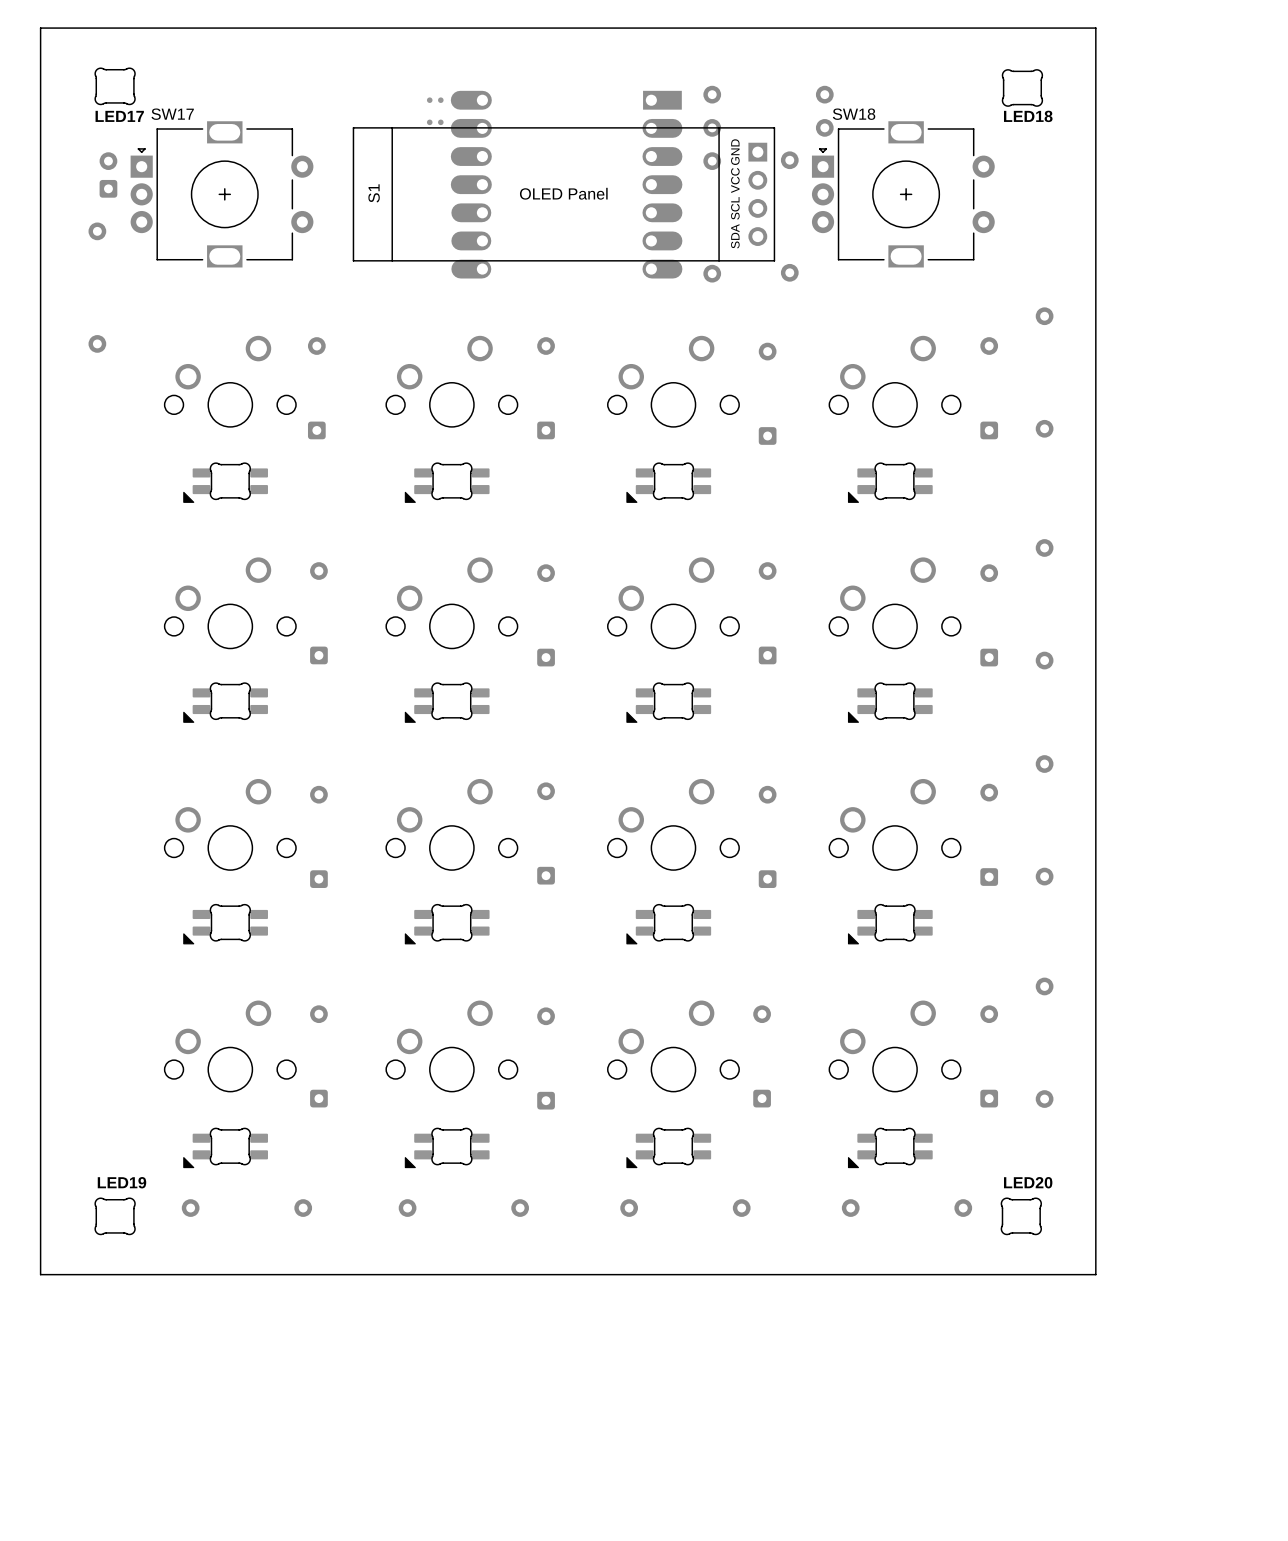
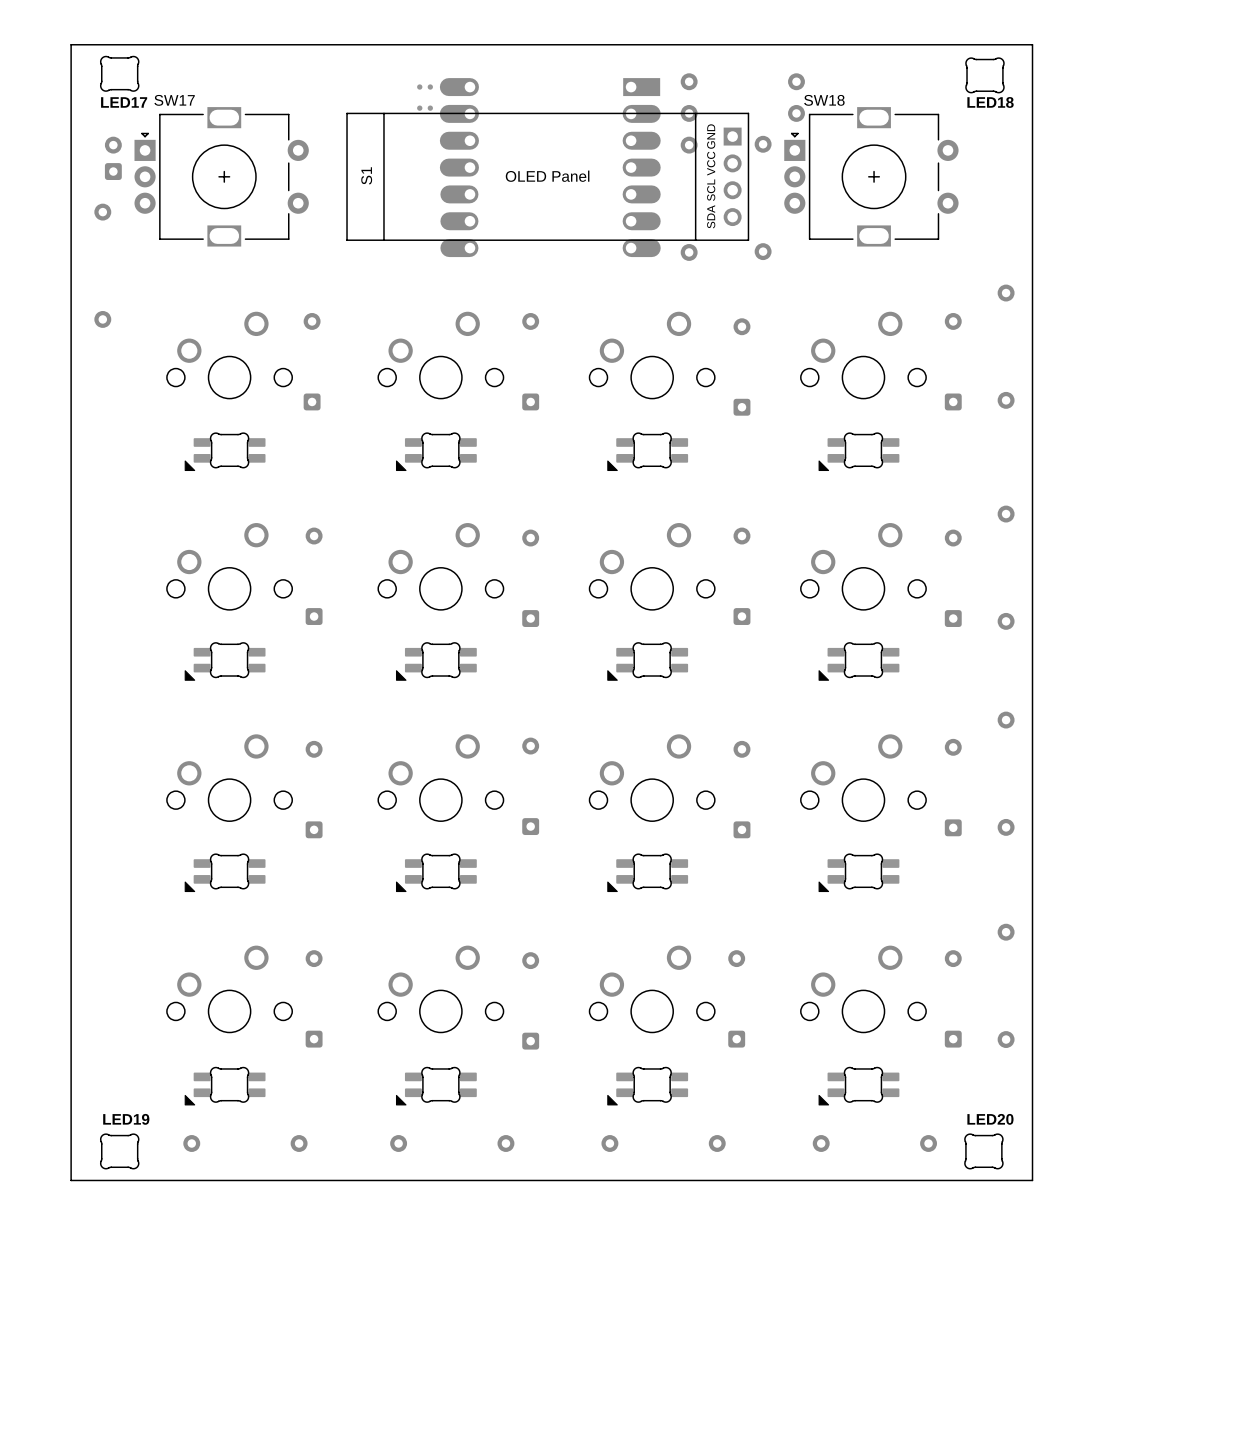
board edge: (40, 28) (1095, 28) (1095, 1274) (40, 1274) (40, 28) -> (71, 44) (71, 1180) (1032, 1180) (1032, 44) (71, 44)

